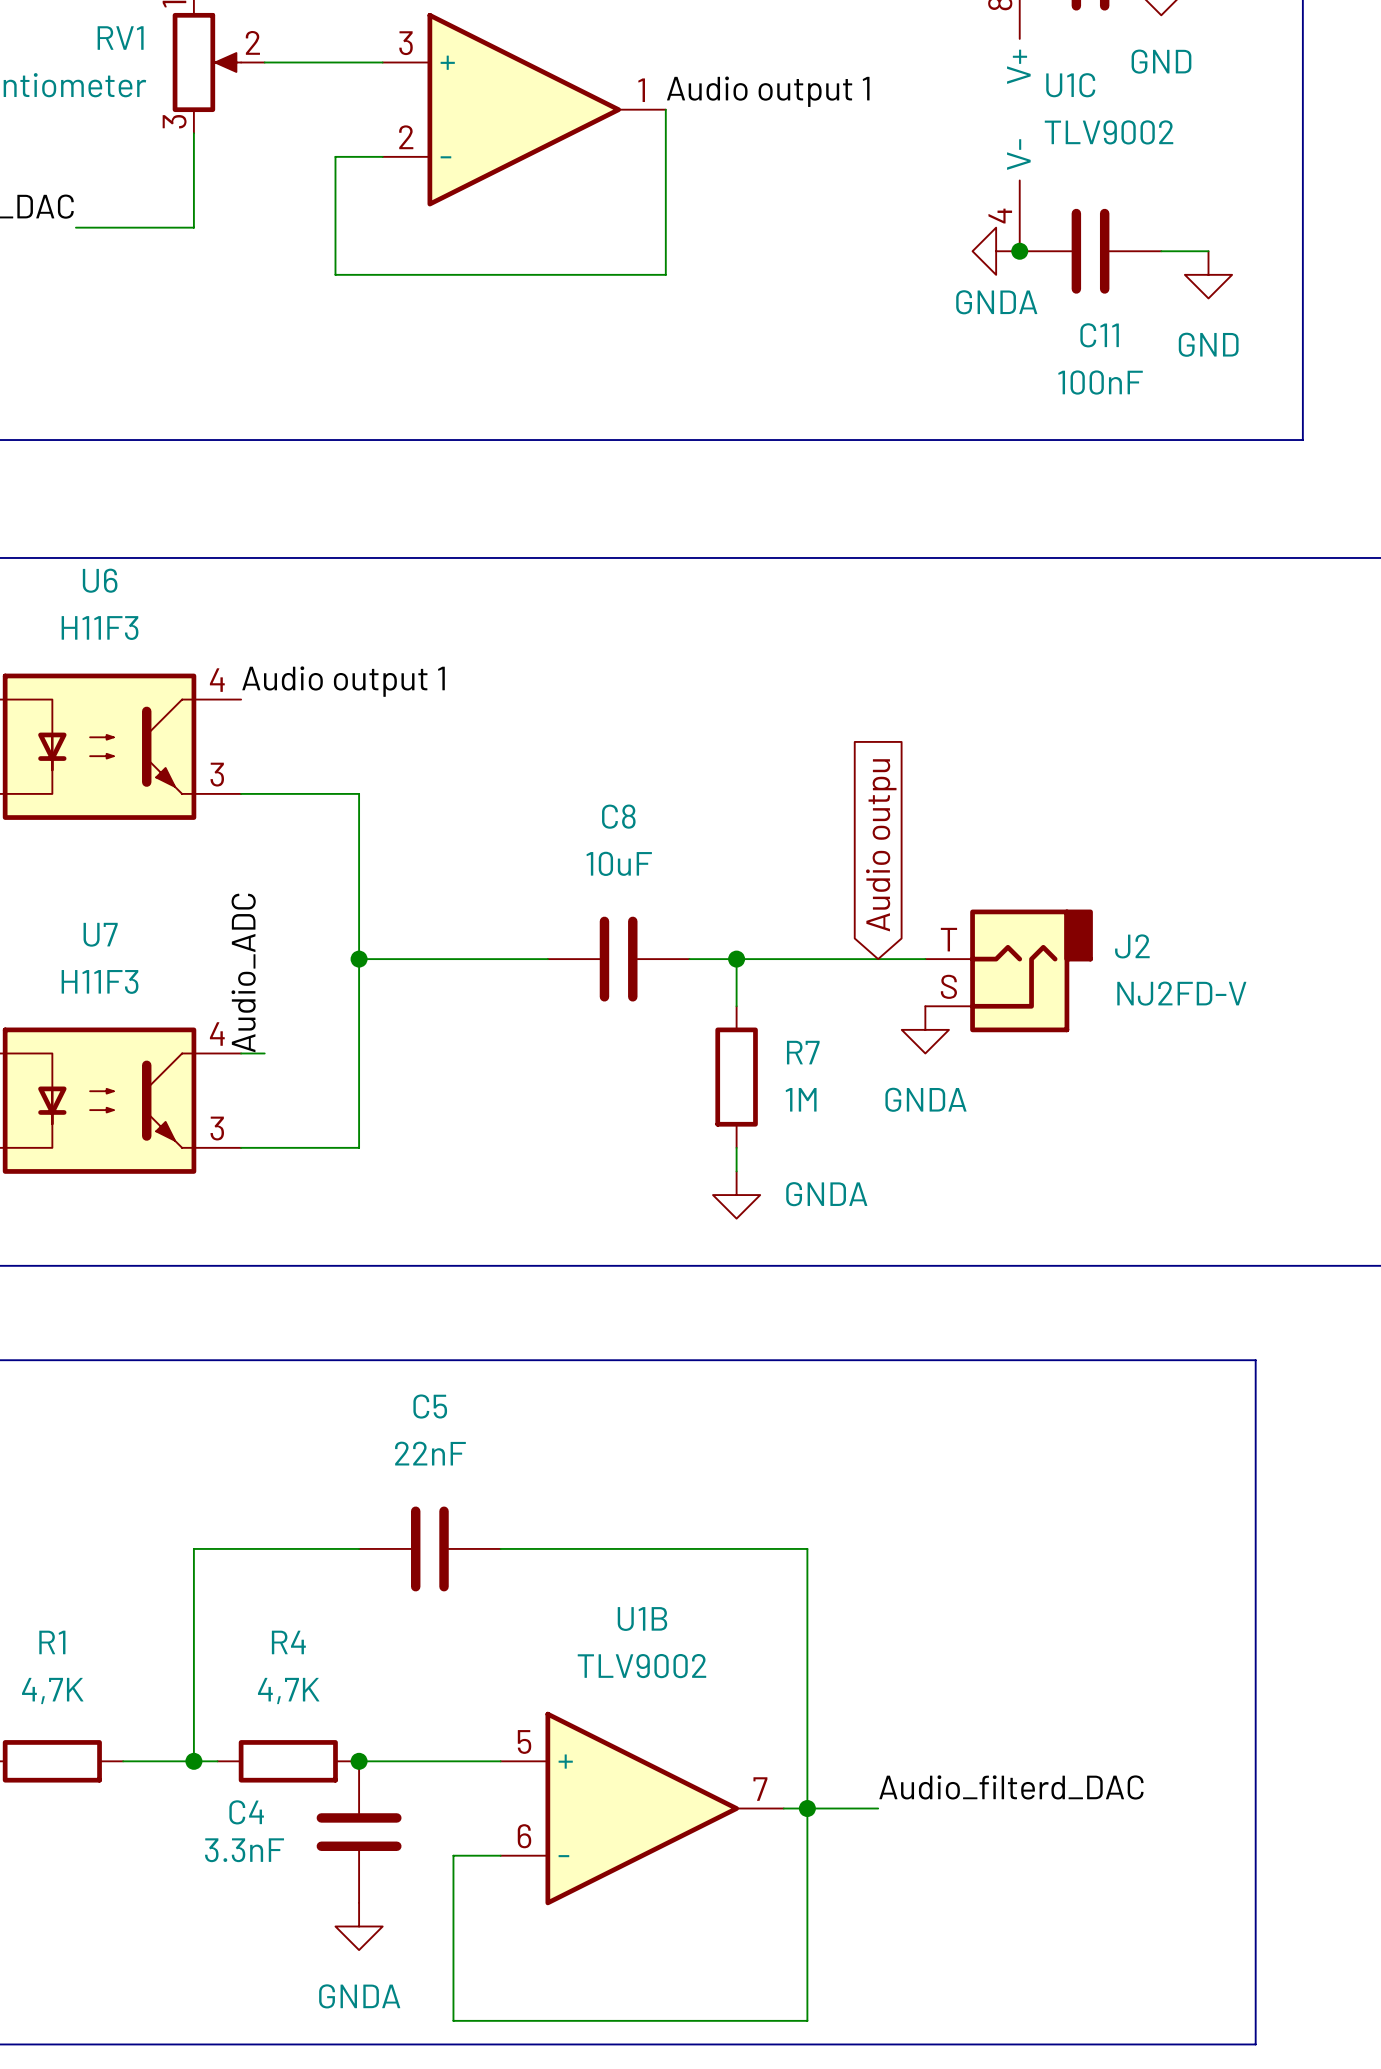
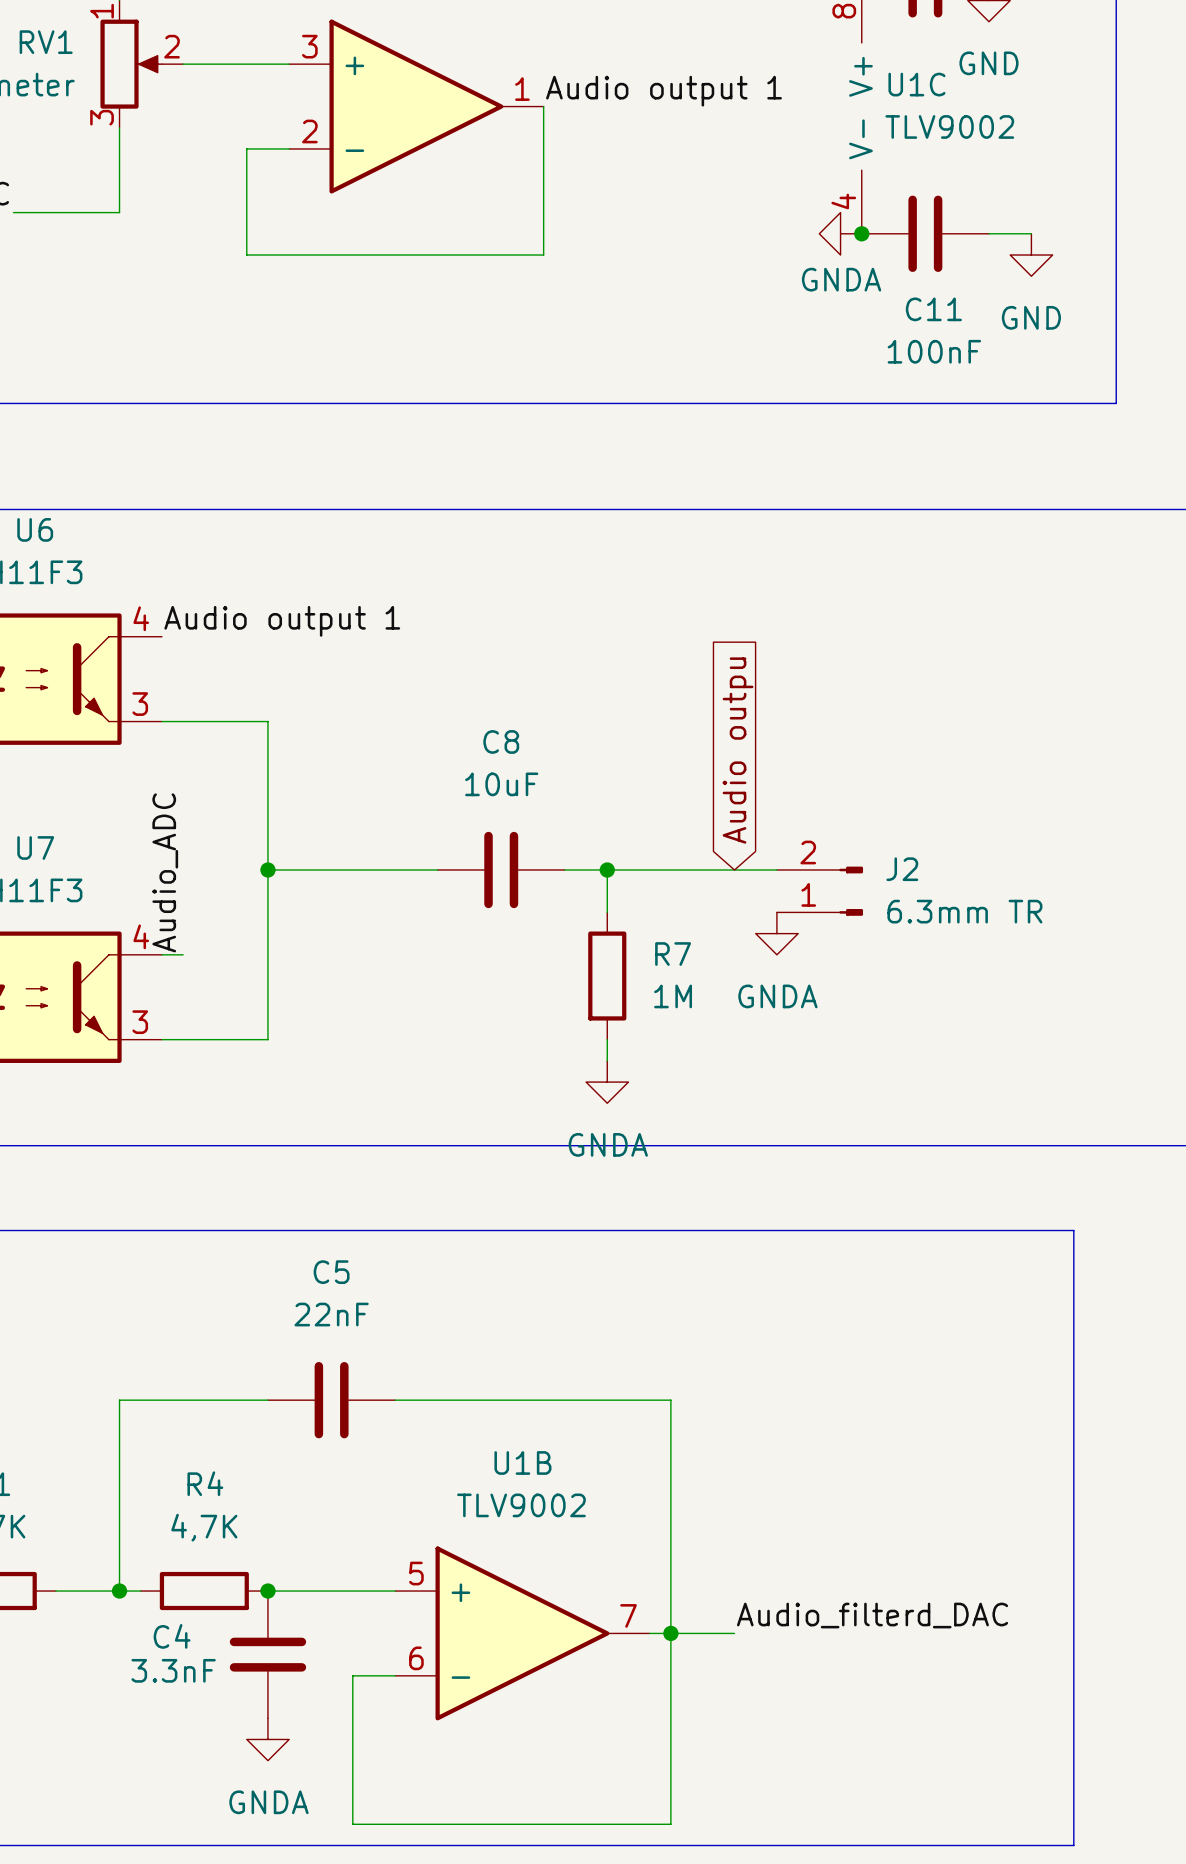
J2 symbol: [925, 909, 1093, 1033] -> [776, 866, 864, 916]
J2 value: NJ2FD-V (1181, 993) -> 6.3mm TR (964, 911)
power symbol text position: GNDA (826, 1194) -> GNDA (608, 1144)

